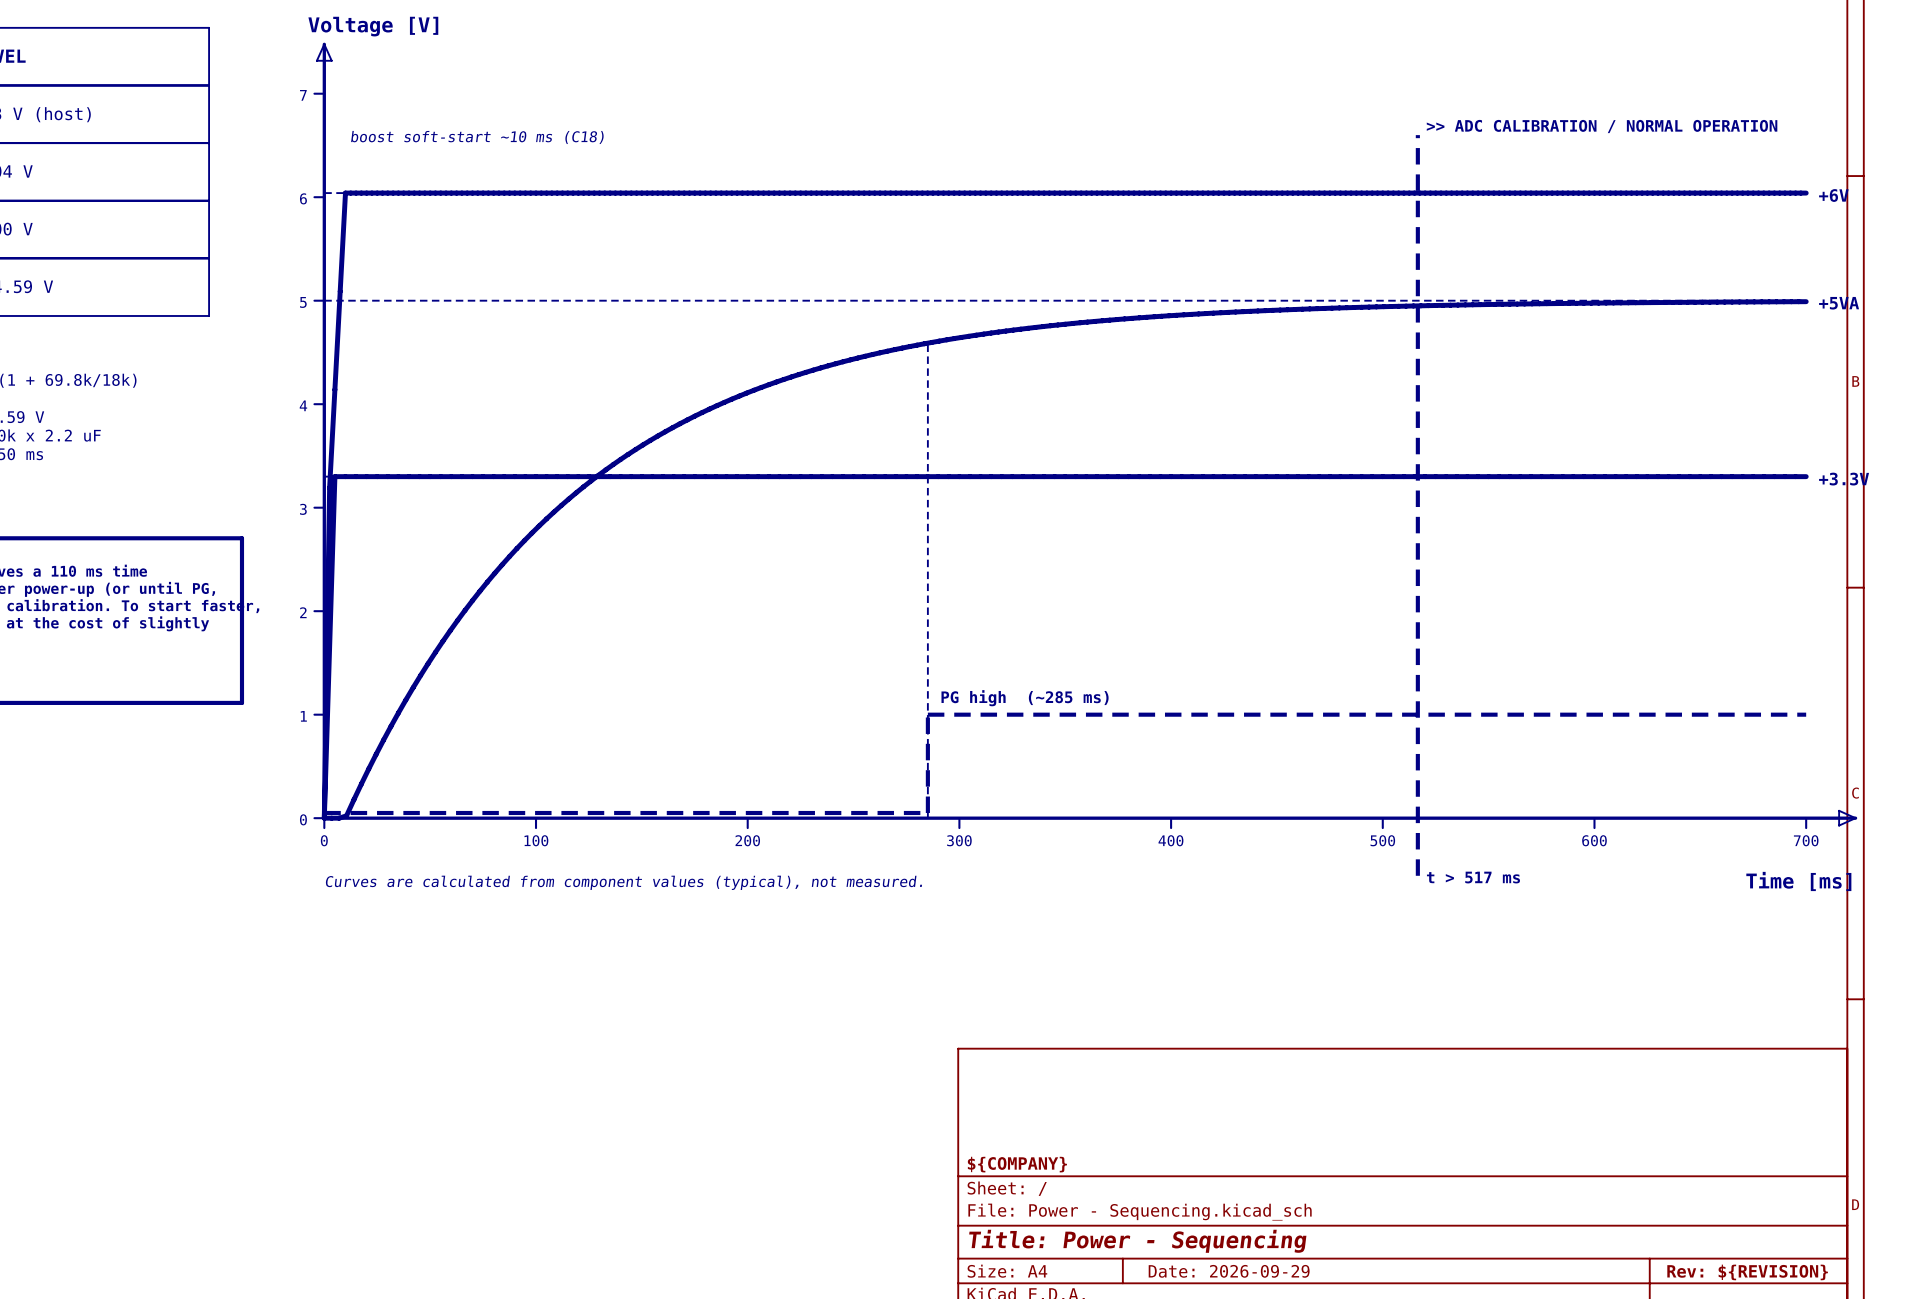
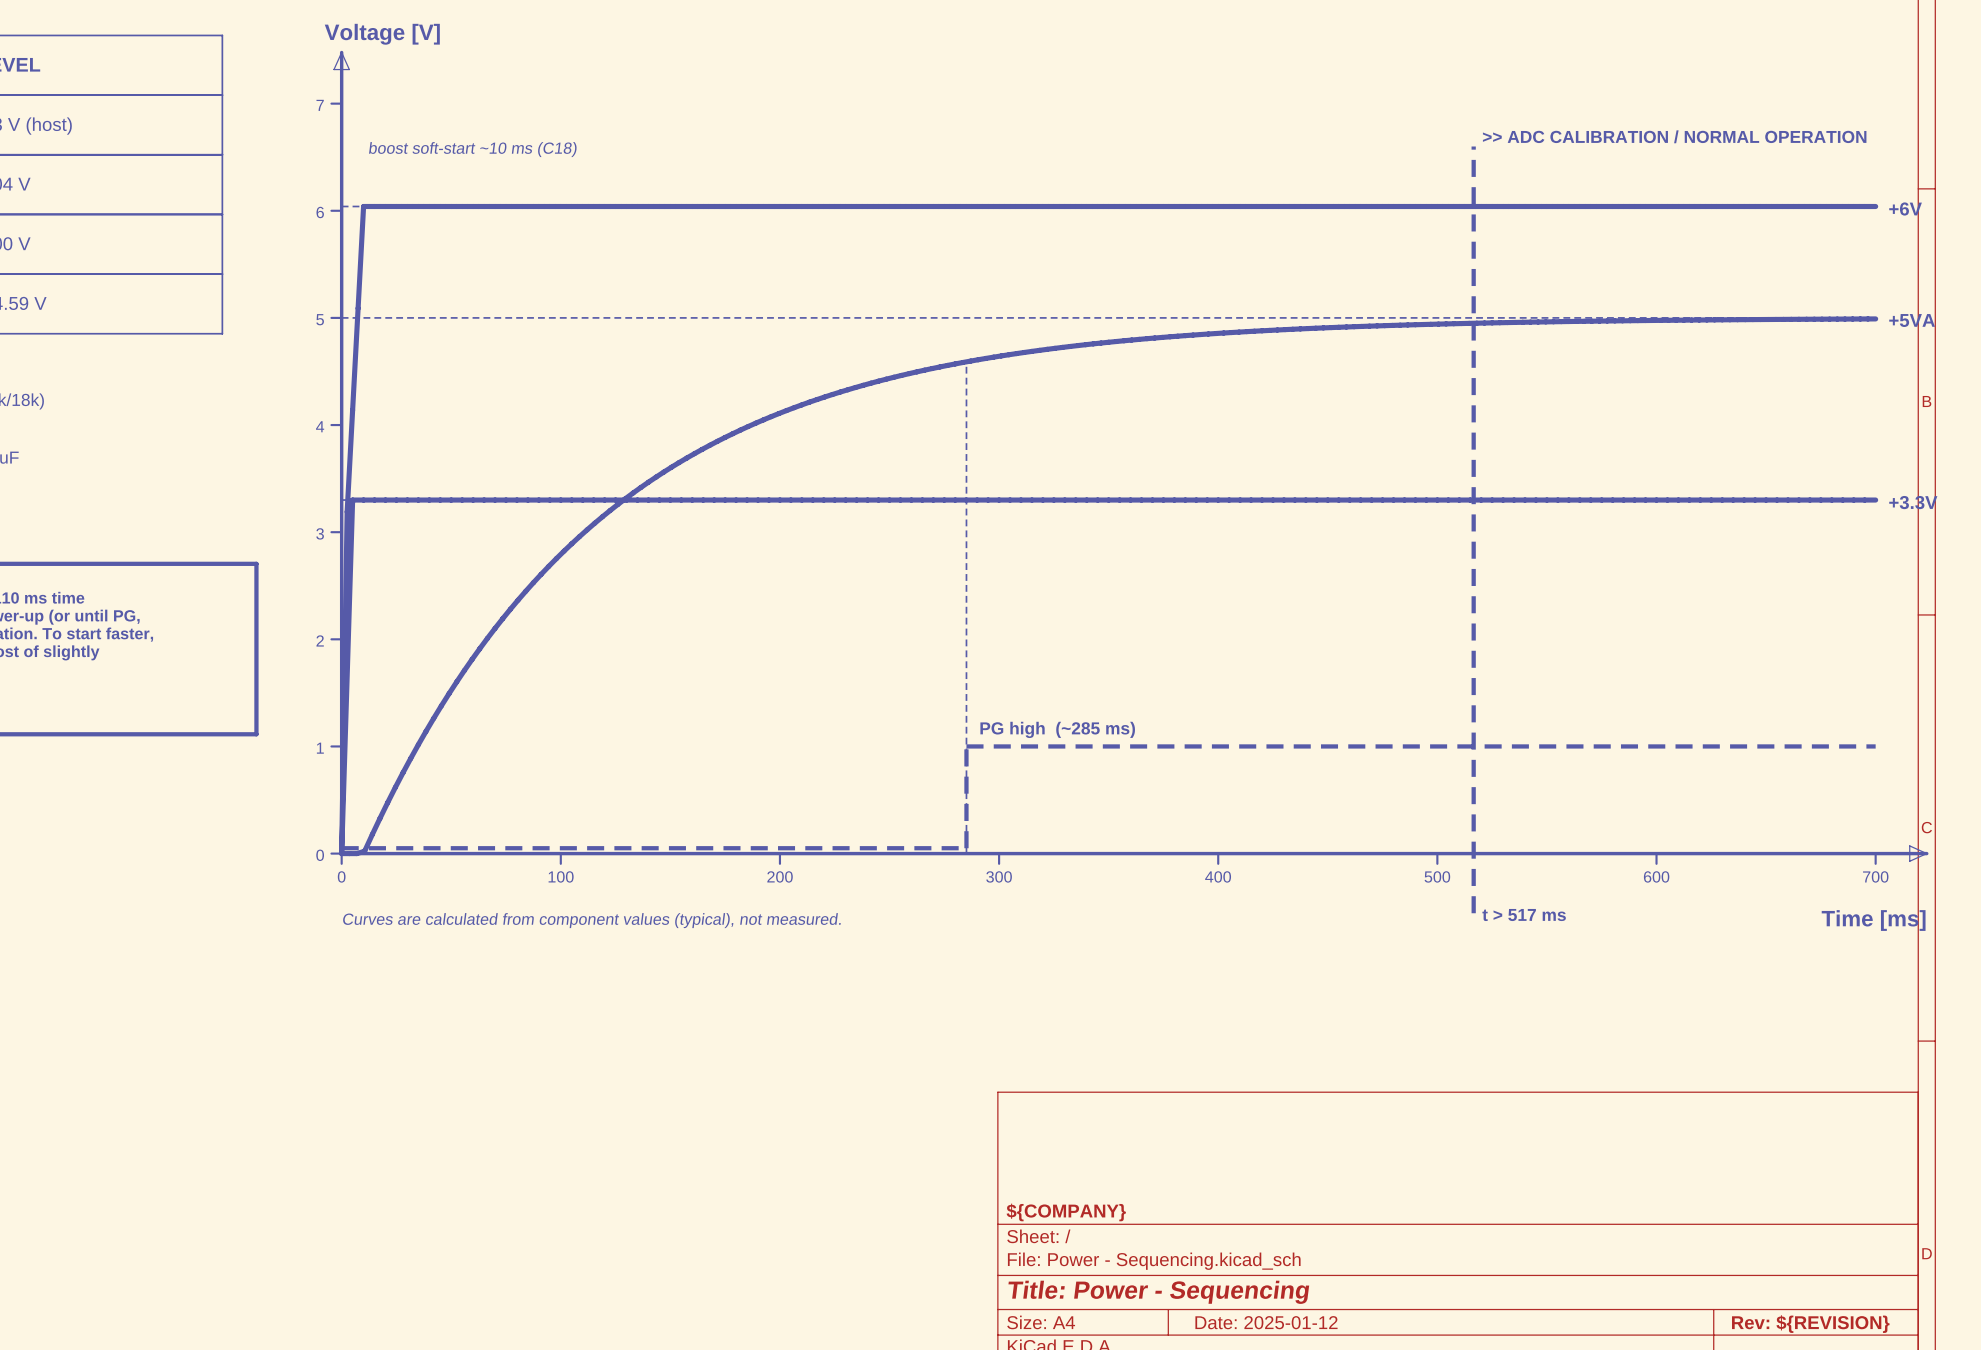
title block: Date: 2026-09-29 (1229, 1271) -> Date: 2025-01-12 (1266, 1322)

